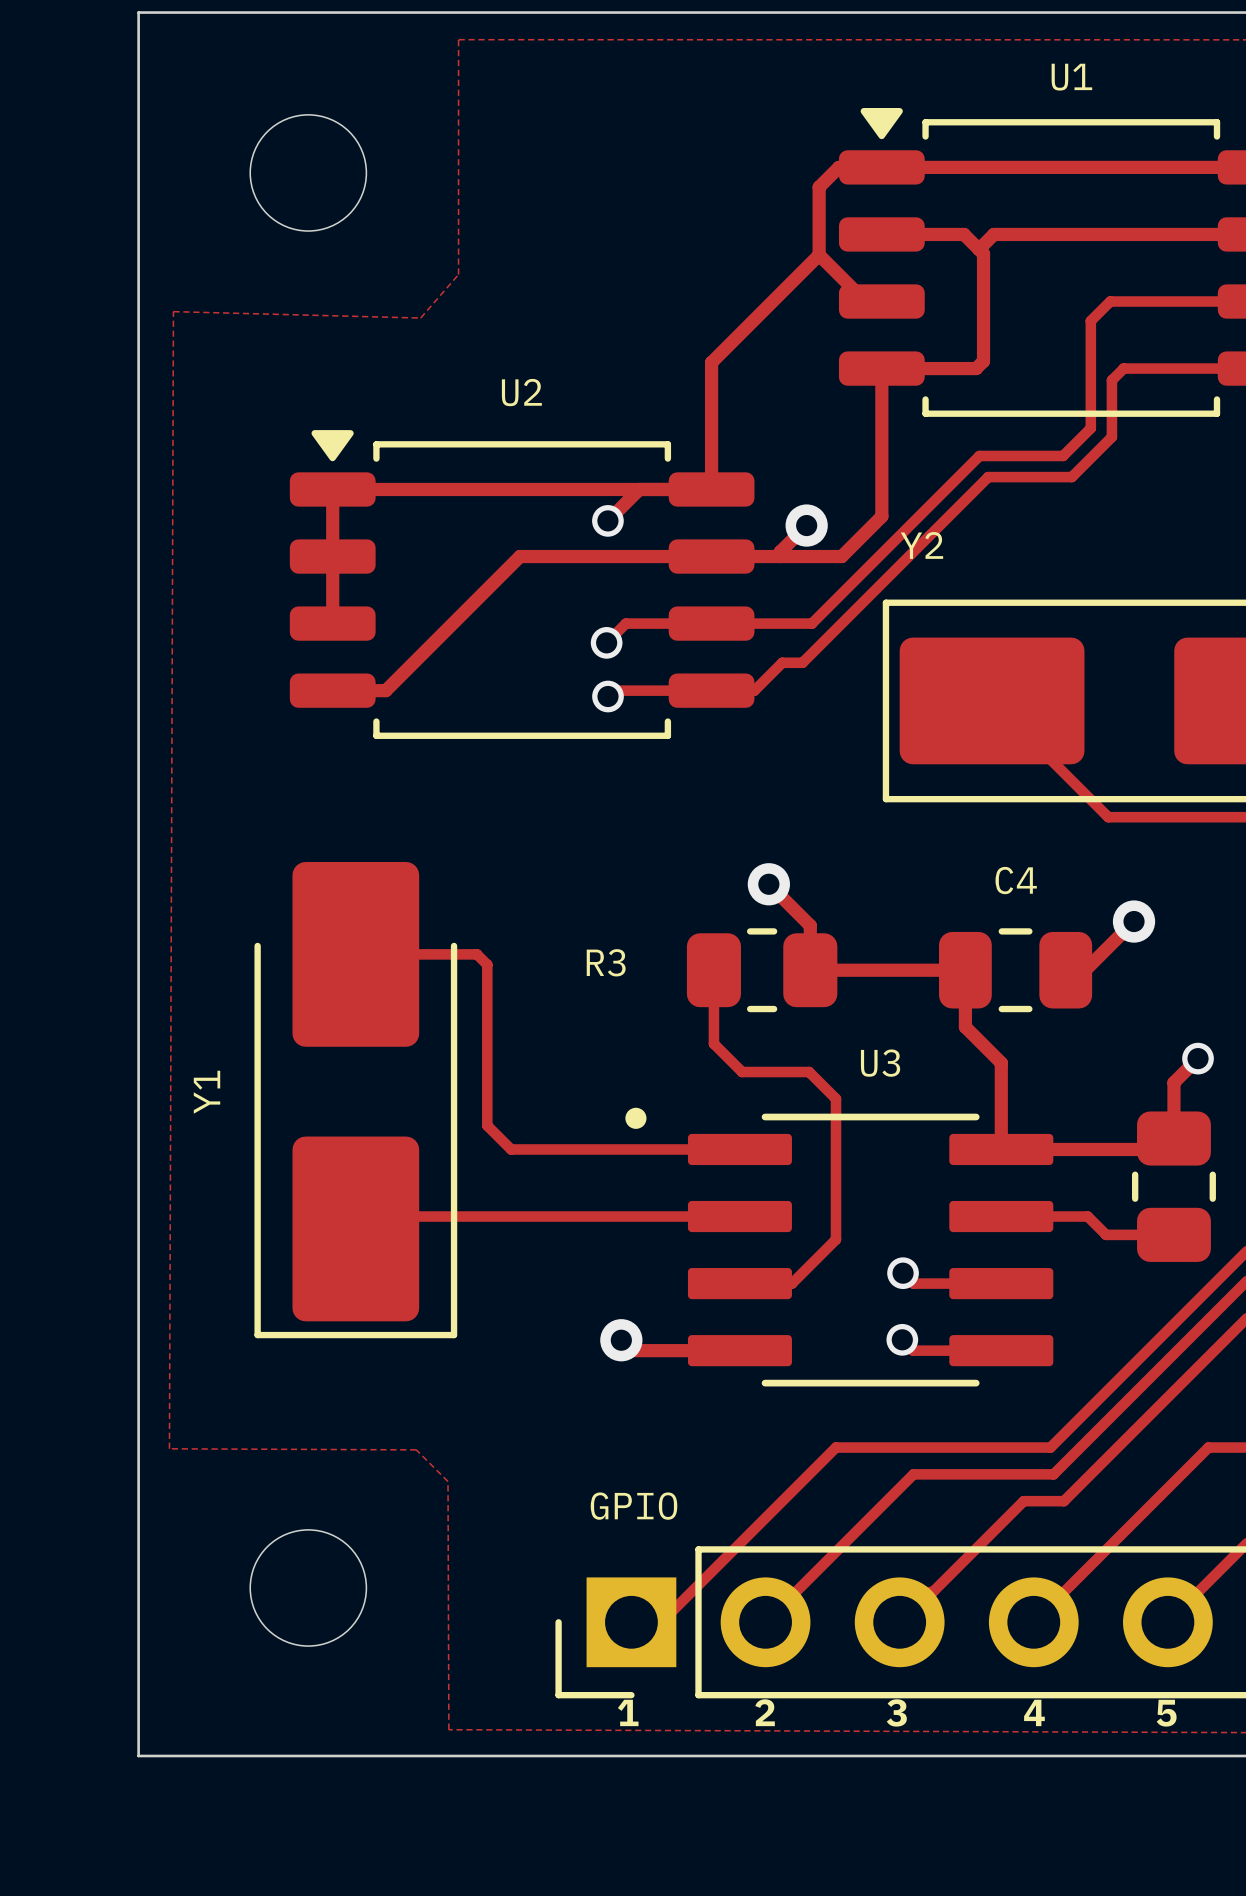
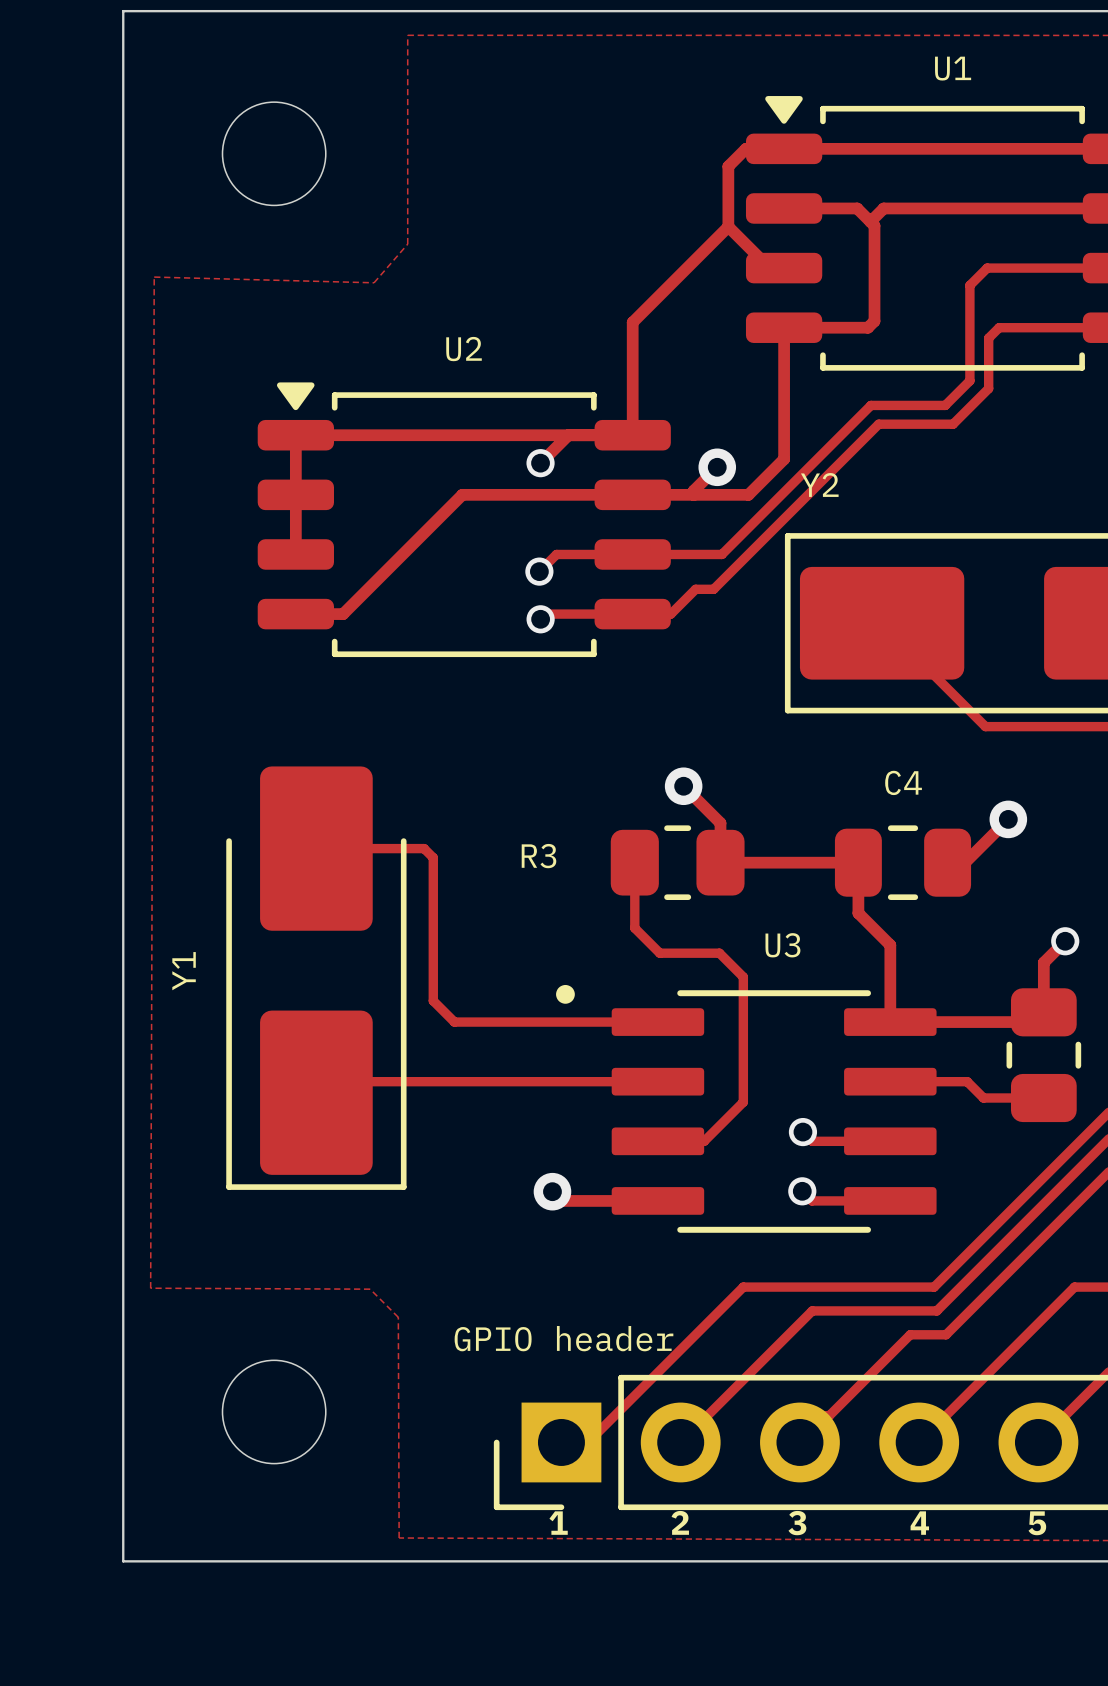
part text: GPIO (634, 1506) -> GPIO header (563, 1338)

